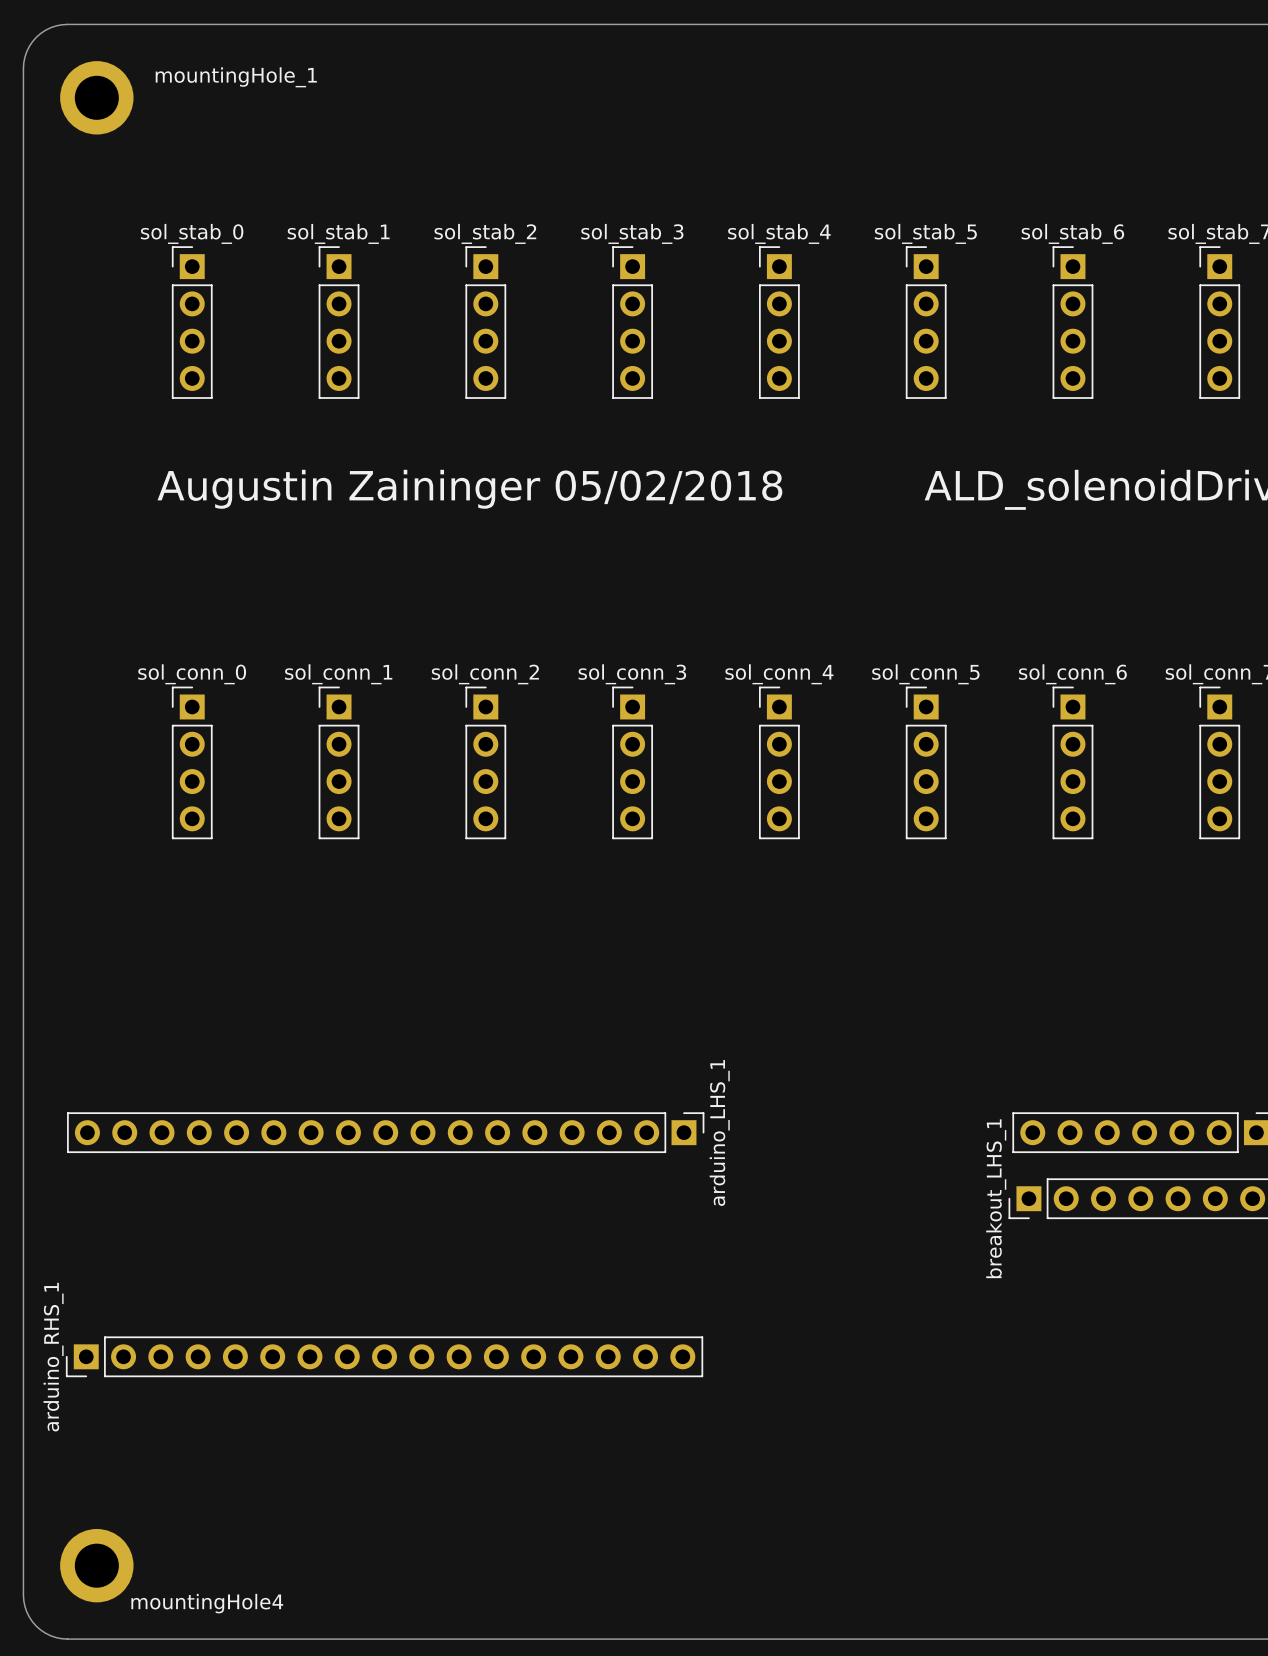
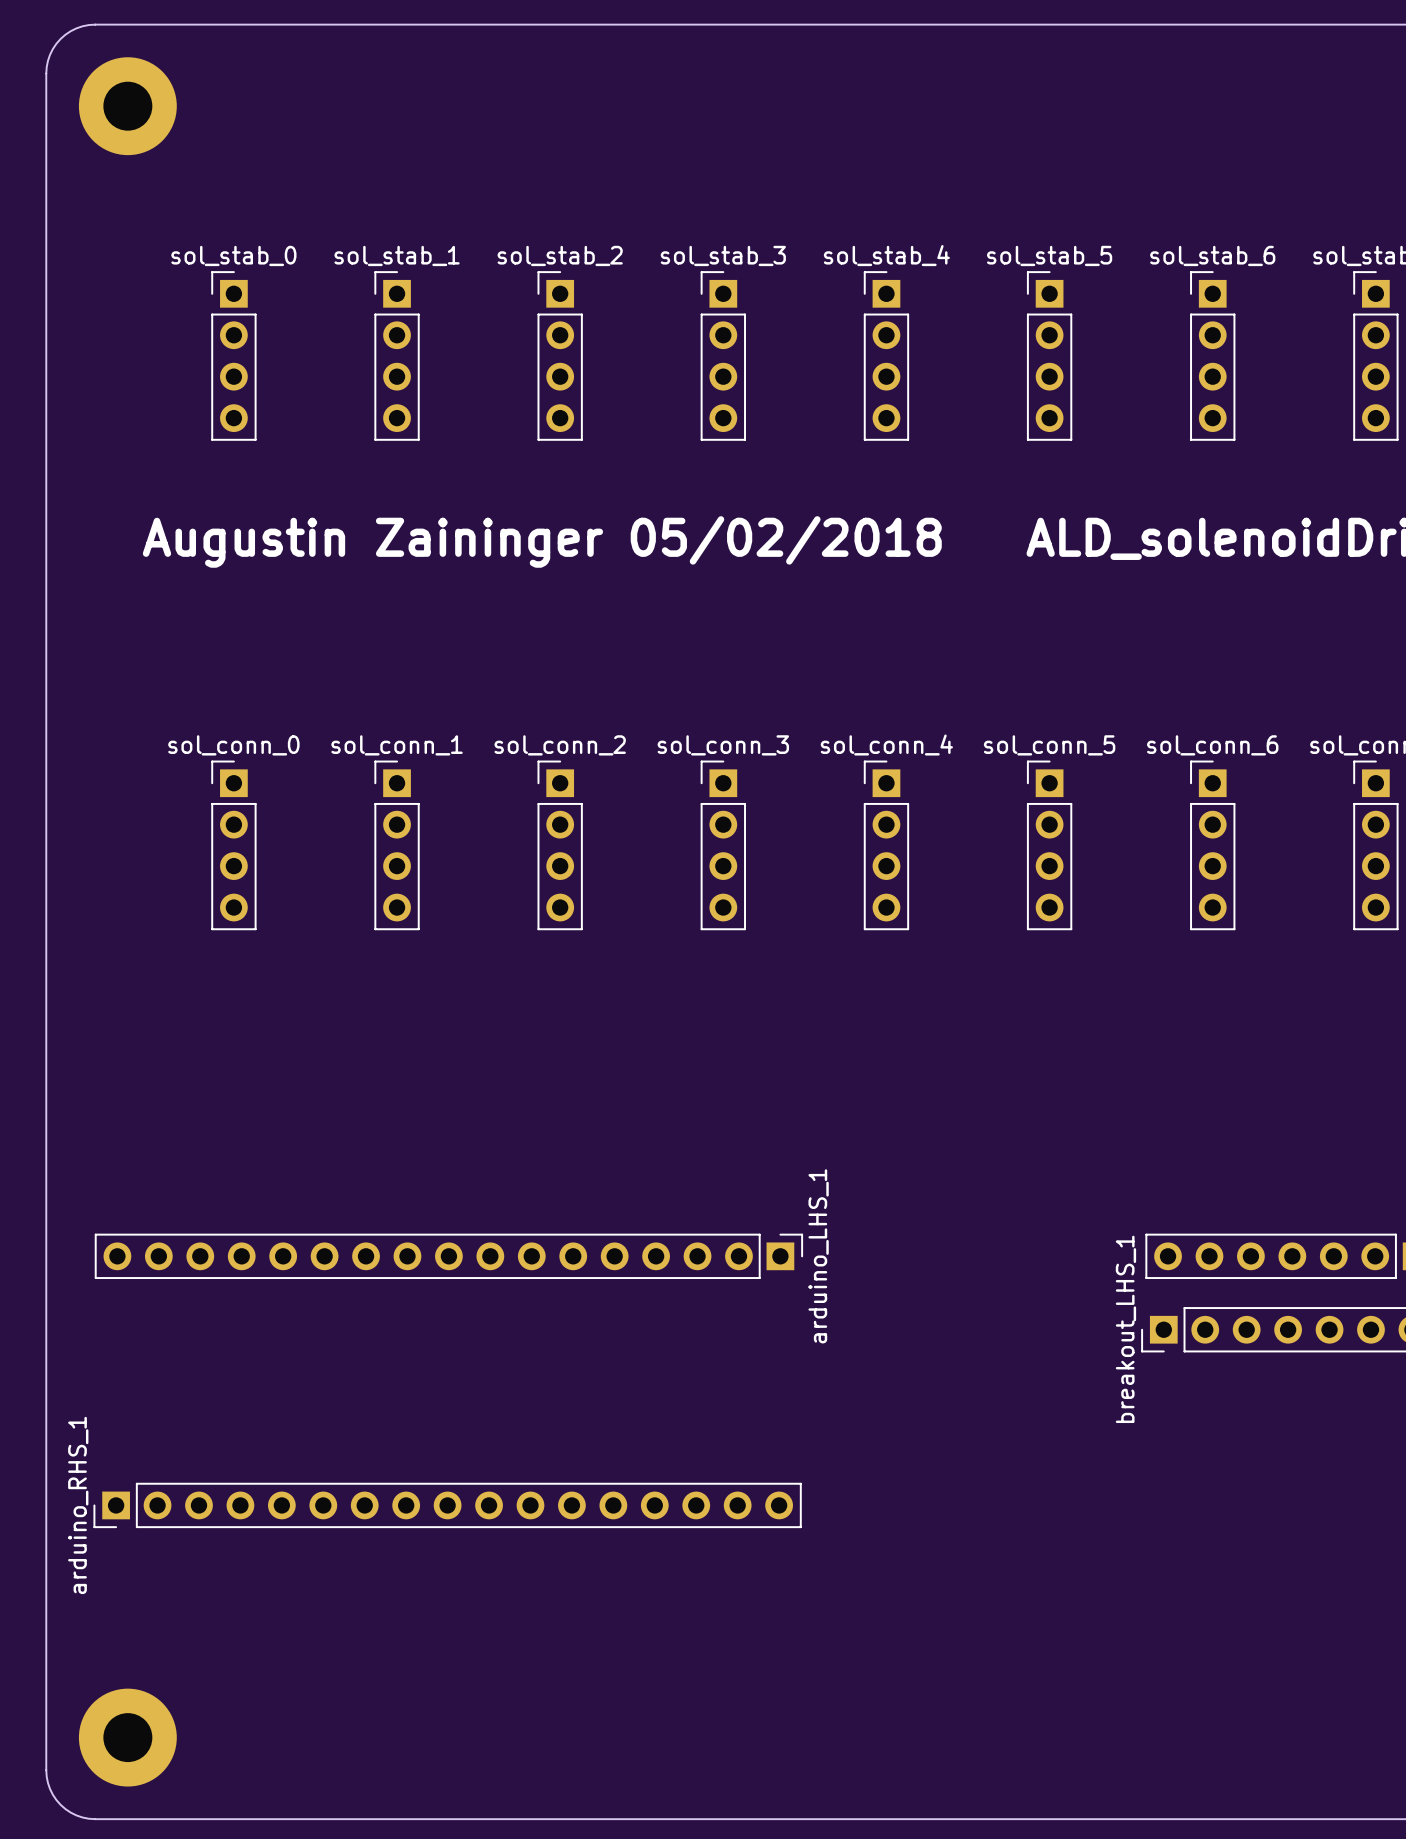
mountingHole_1: (96, 97) -> none
part: none -> (127, 106)
mountingHole4: (96, 1565) -> none
part: none -> (127, 1737)

